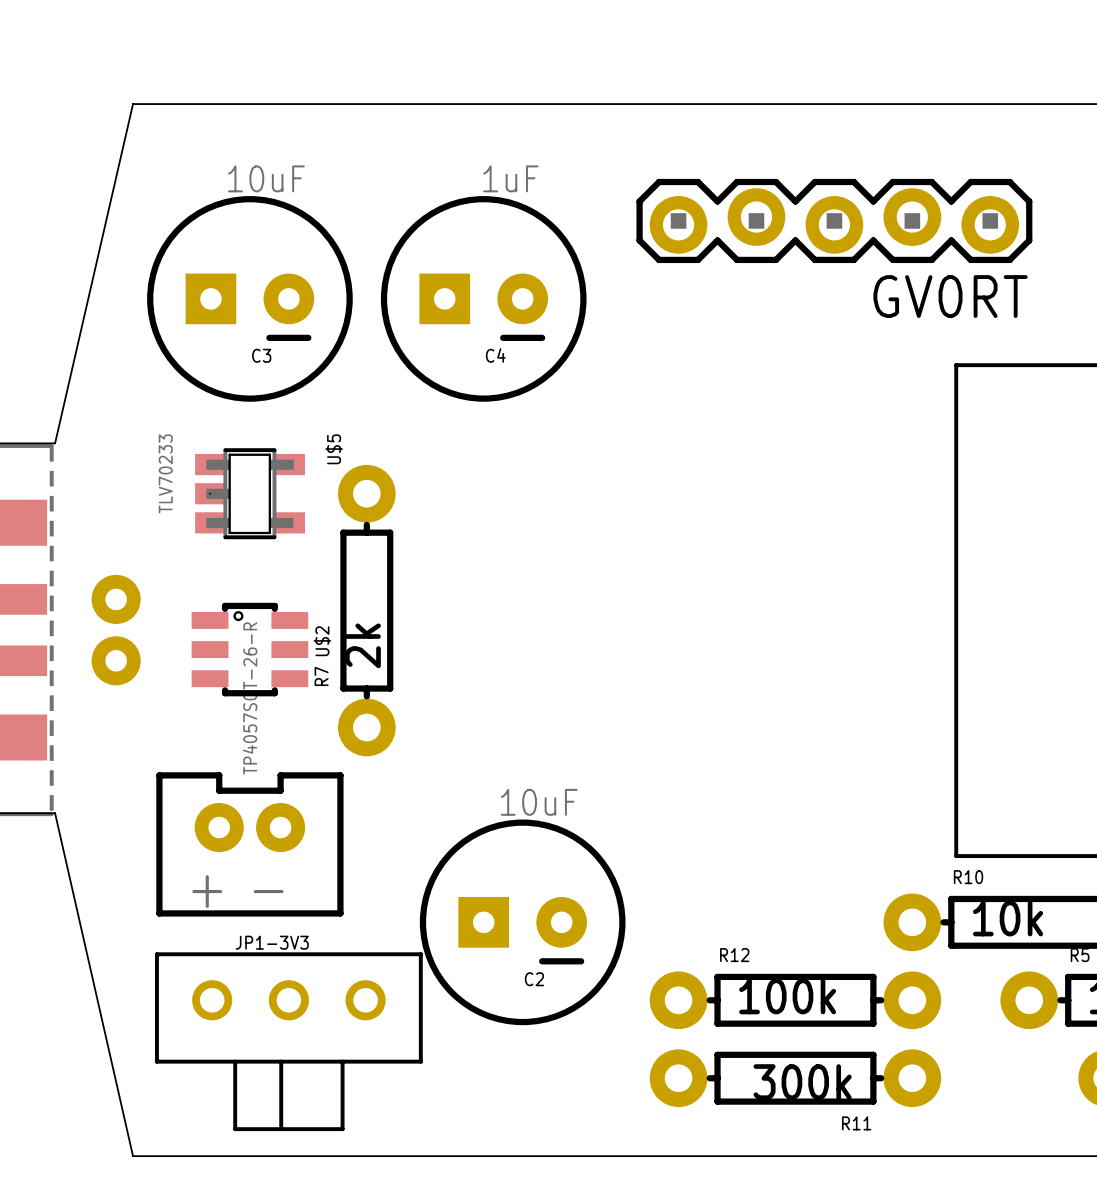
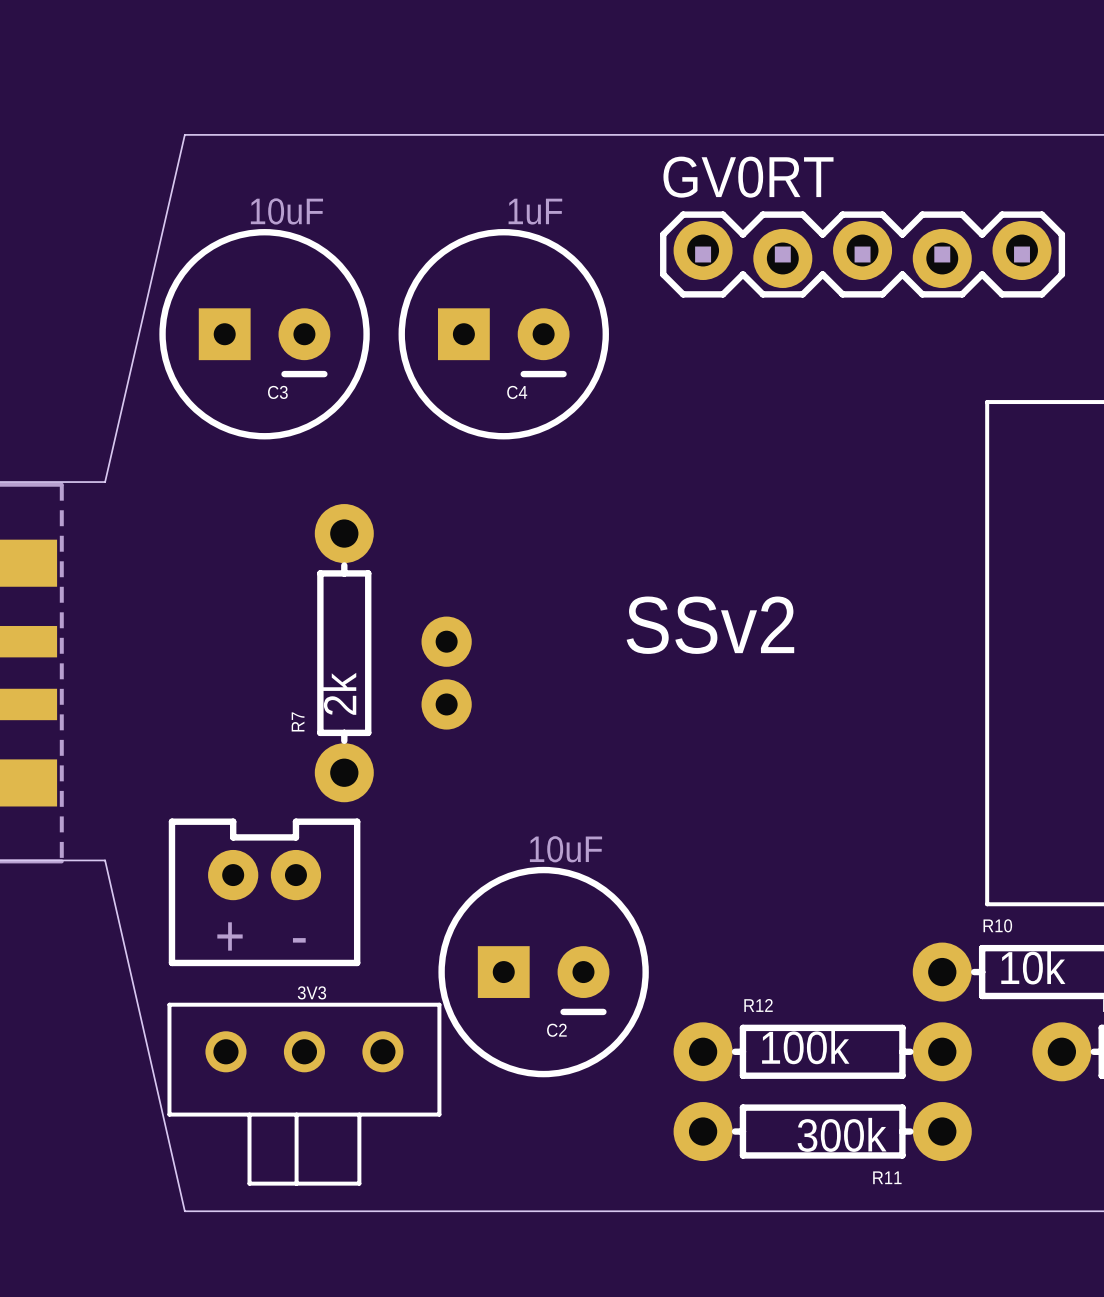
board edge: (171, 104) (133, 104) (55, 443) -> (184, 134) (105, 482) (65, 482)
GV0RT rotation: 0° (834, 220) -> 180° (862, 254)
U$5: TLV70233 (250, 493) -> none
text: none -> SSv2 (710, 625)
R7 position: (366, 610) -> (344, 653)
part position: (116, 630) -> (446, 673)
U$2: TP4057SOT-26-R (249, 649) -> none
board edge: (55, 813) (133, 1156) (171, 1156) -> (65, 860) (105, 860) (184, 1211)
JP1-3V3 name: JP1-3V3 (272, 942) -> 3V3 (311, 992)

